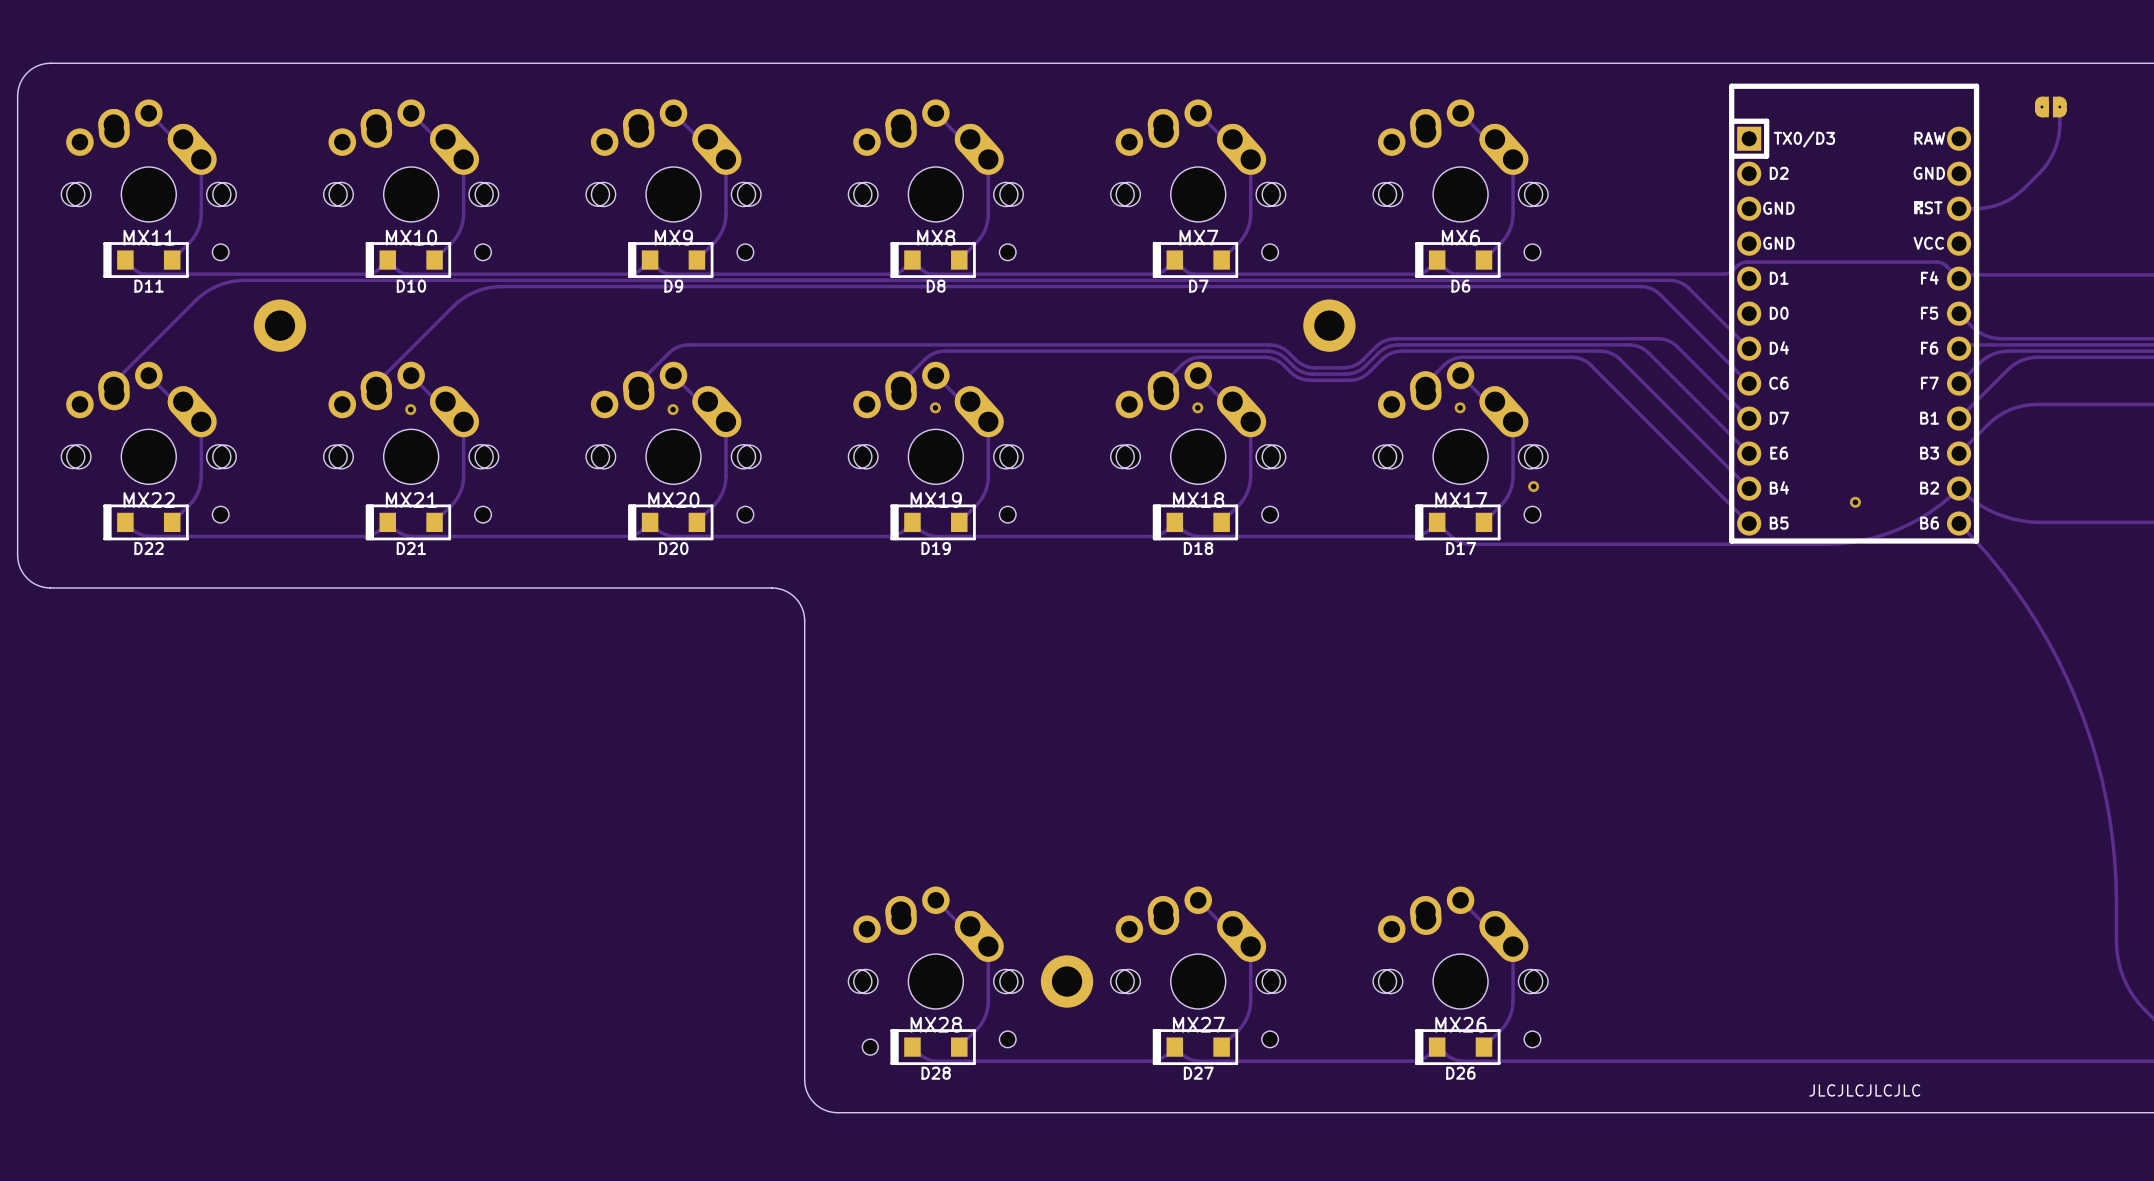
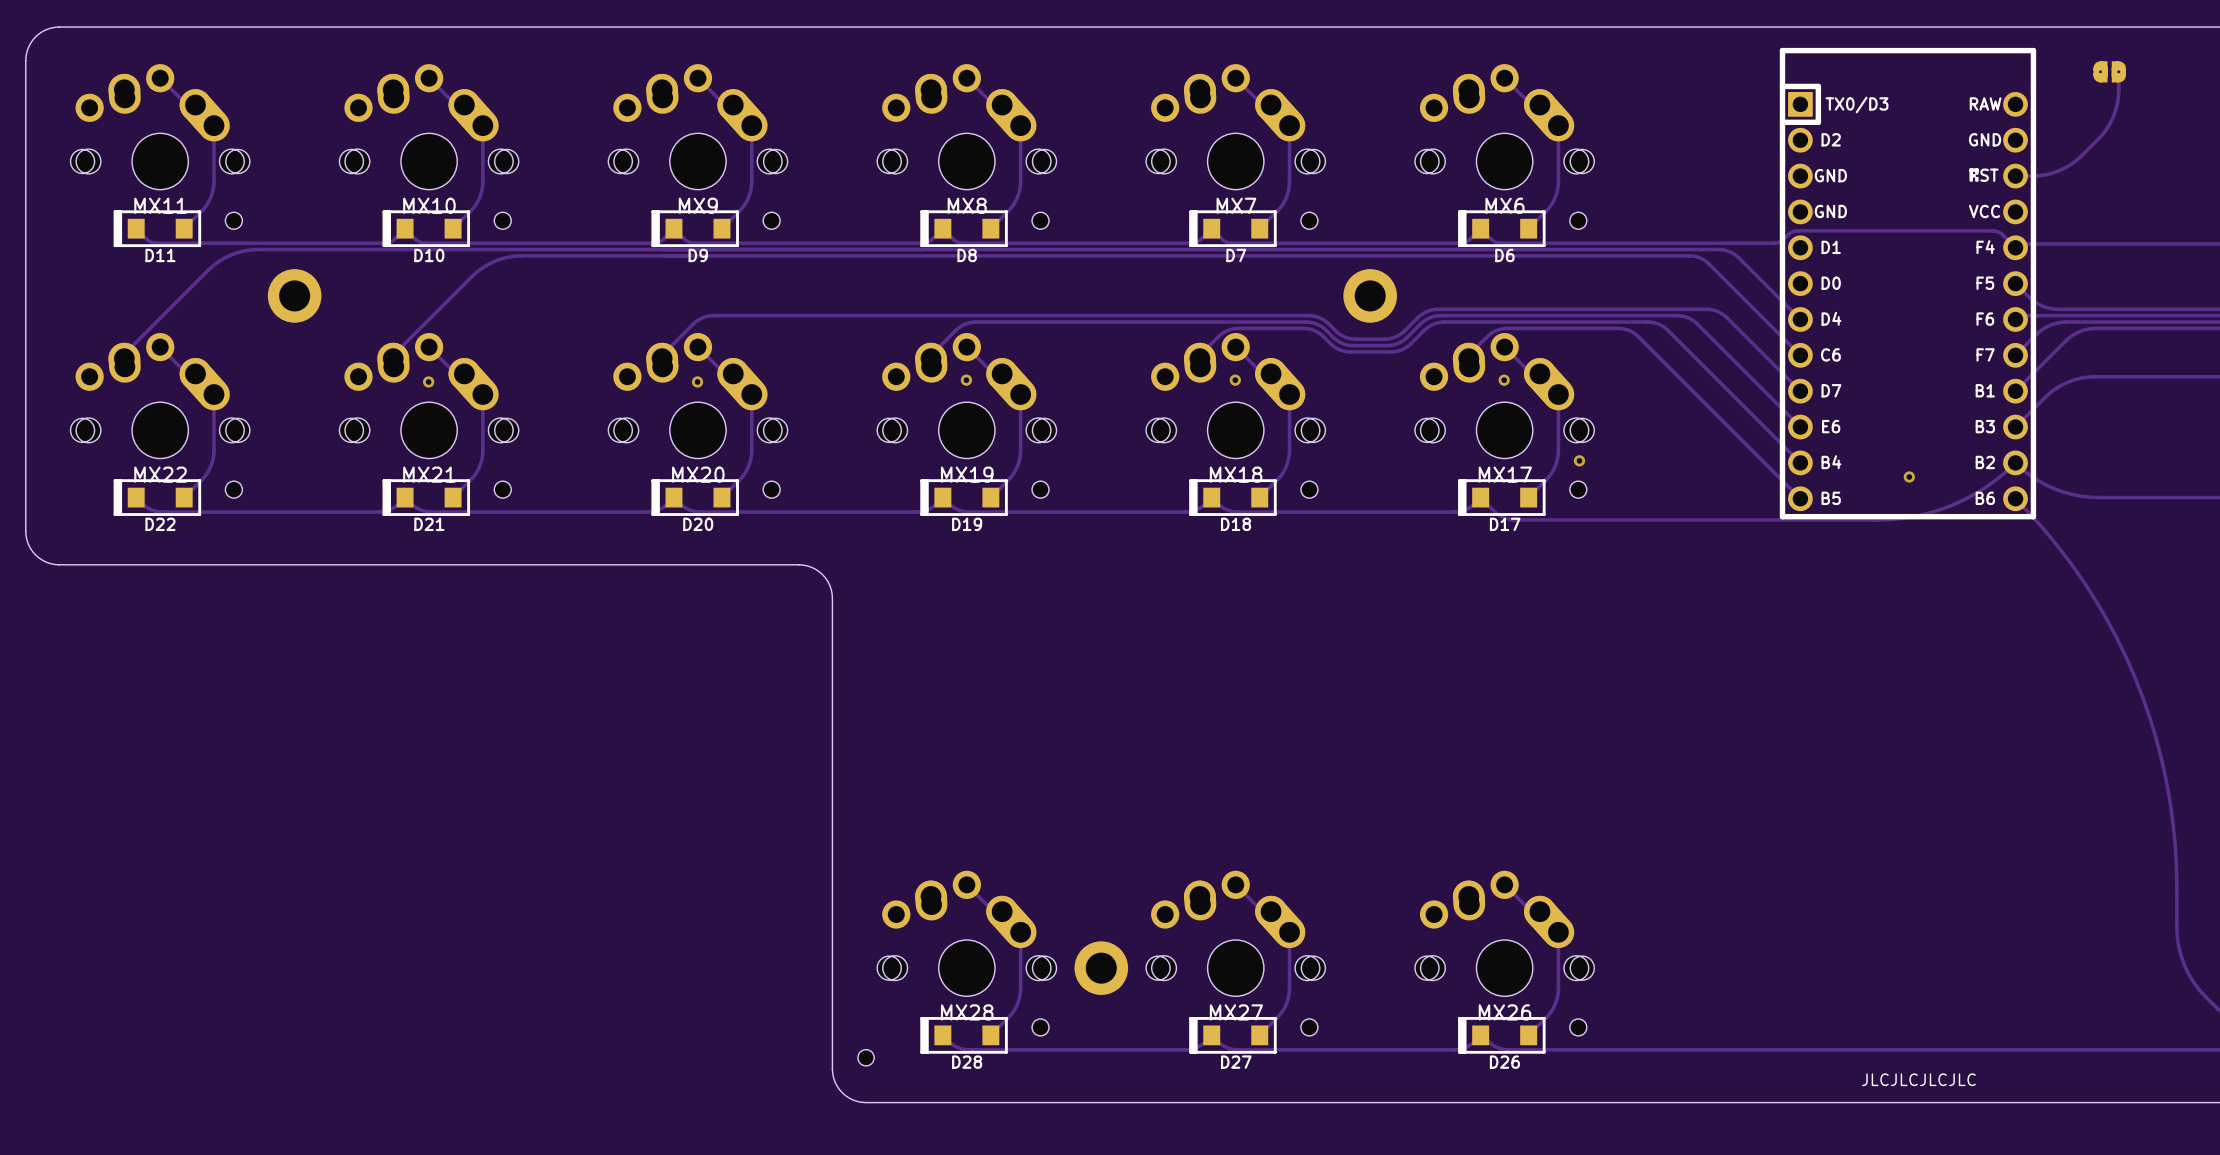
part position: (870, 1047) -> (866, 1057)

